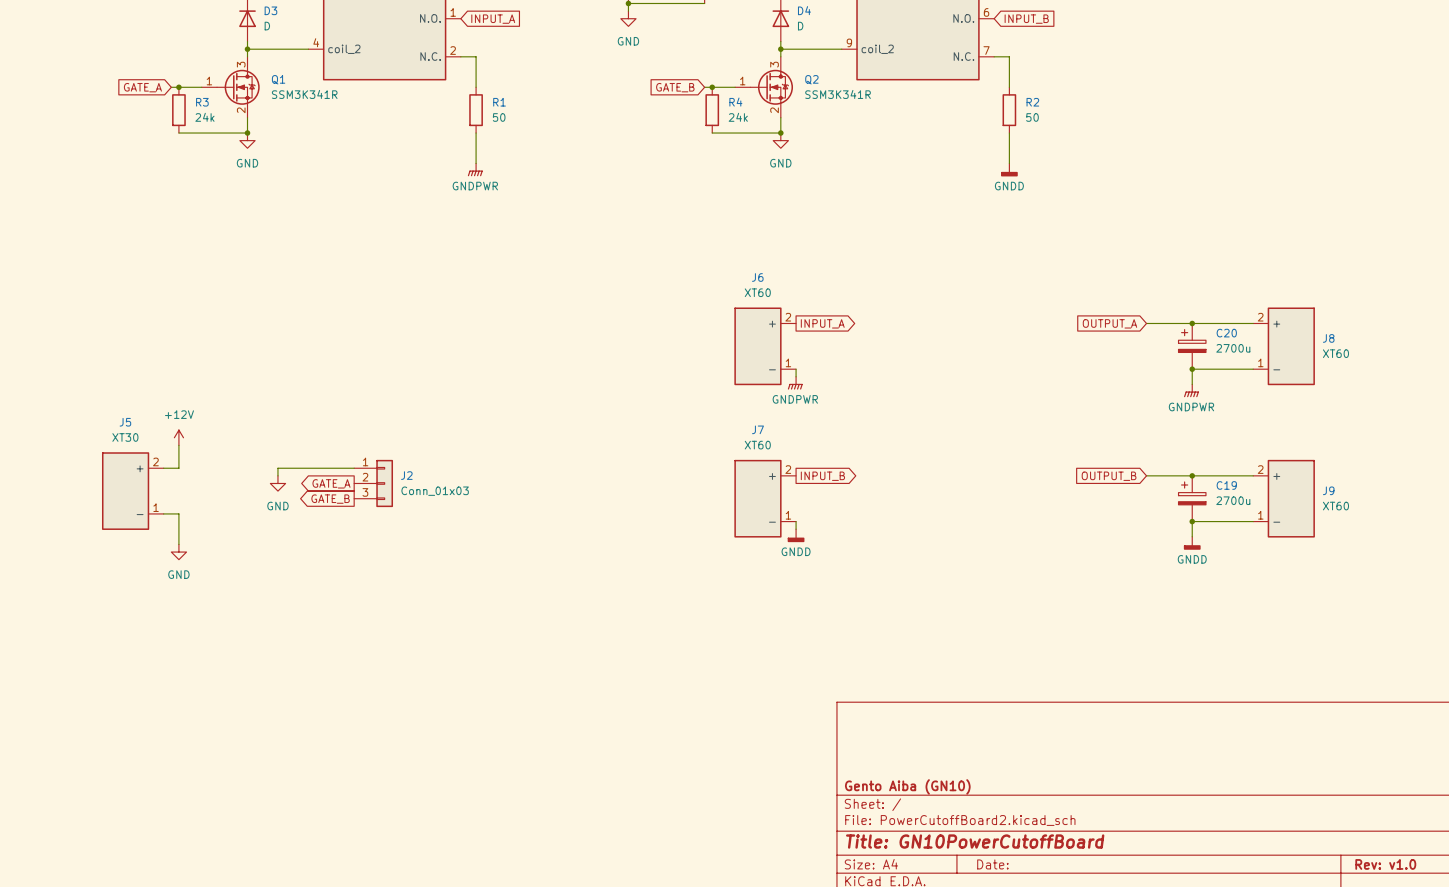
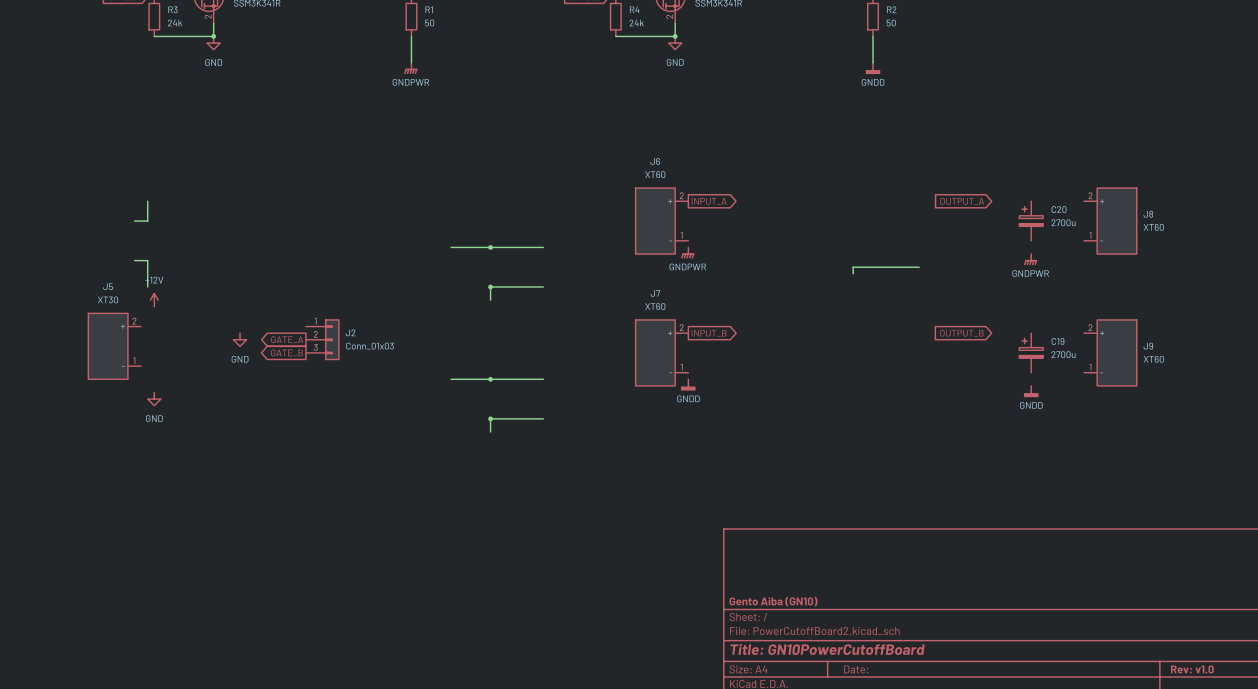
wire: (1146, 323) (1253, 323) -> none
junction: (1192, 323) -> none
wire: (796, 369) (796, 376) -> none
junction: (1192, 369) -> none
wire: (1253, 369) (1192, 369) (1192, 384) -> none
wire: none -> (451, 247) (543, 247)
junction: none -> (490, 247)
wire: none -> (919, 267) (853, 267) (853, 273)
junction: none -> (490, 286)
wire: none -> (543, 286) (490, 286) (490, 300)
wire: (178, 445) (178, 468) (163, 468) -> (147, 201) (147, 221) (134, 221)
wire: (354, 468) (277, 468) (277, 475) -> none
wire: (1146, 475) (1253, 475) -> none
junction: (1192, 475) -> none
wire: (163, 513) (178, 513) (178, 544) -> (134, 260) (147, 260) (147, 286)
wire: (796, 521) (796, 529) -> none
junction: (1192, 521) -> none
wire: (1253, 521) (1192, 521) (1192, 536) -> none
wire: none -> (451, 379) (543, 379)
junction: none -> (490, 379)
junction: none -> (490, 418)
wire: none -> (543, 418) (490, 418) (490, 432)

